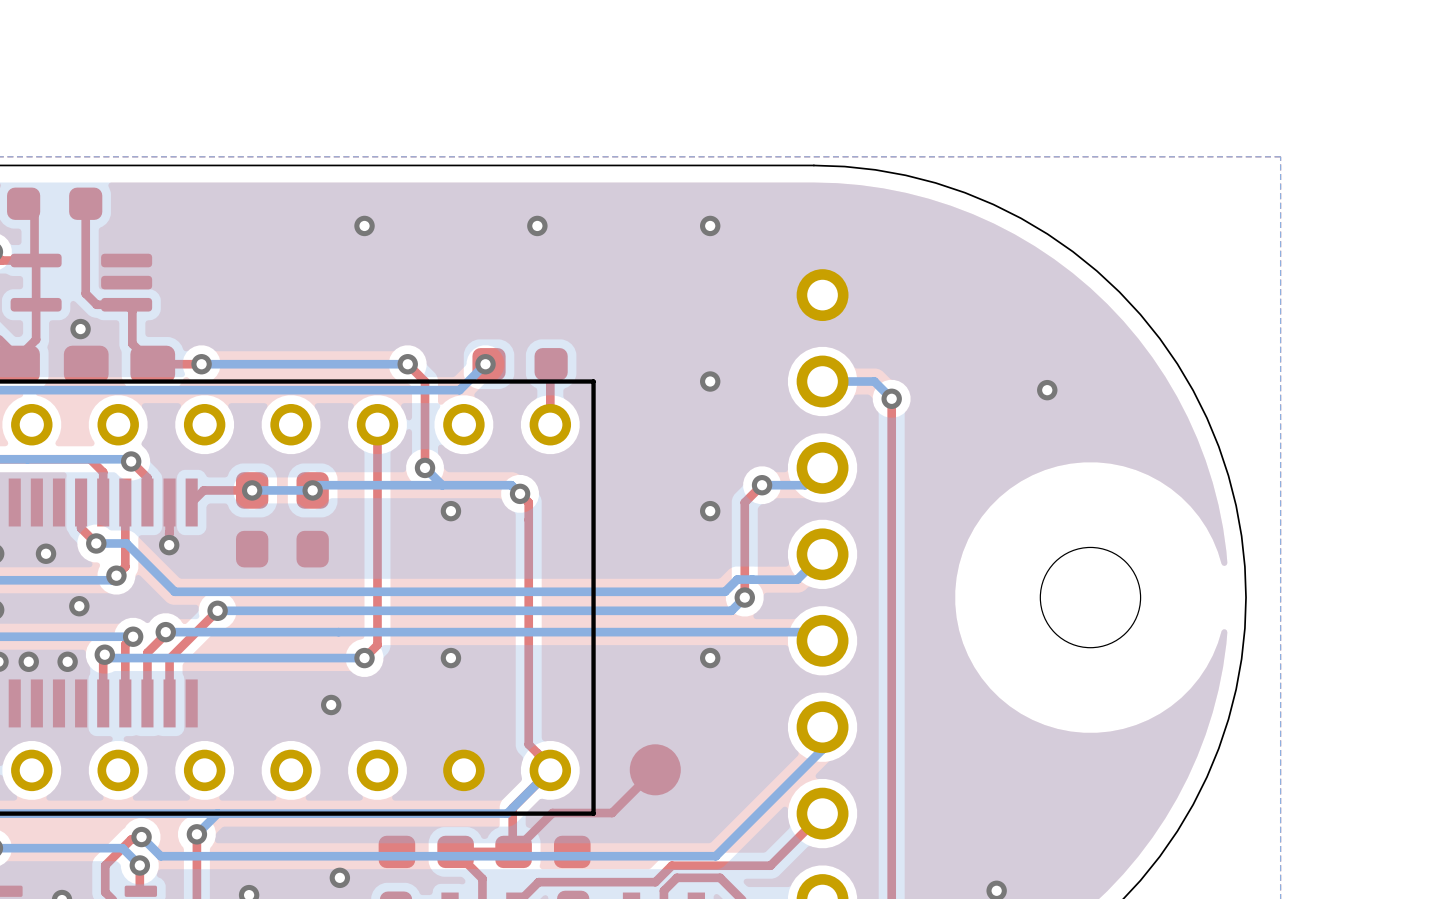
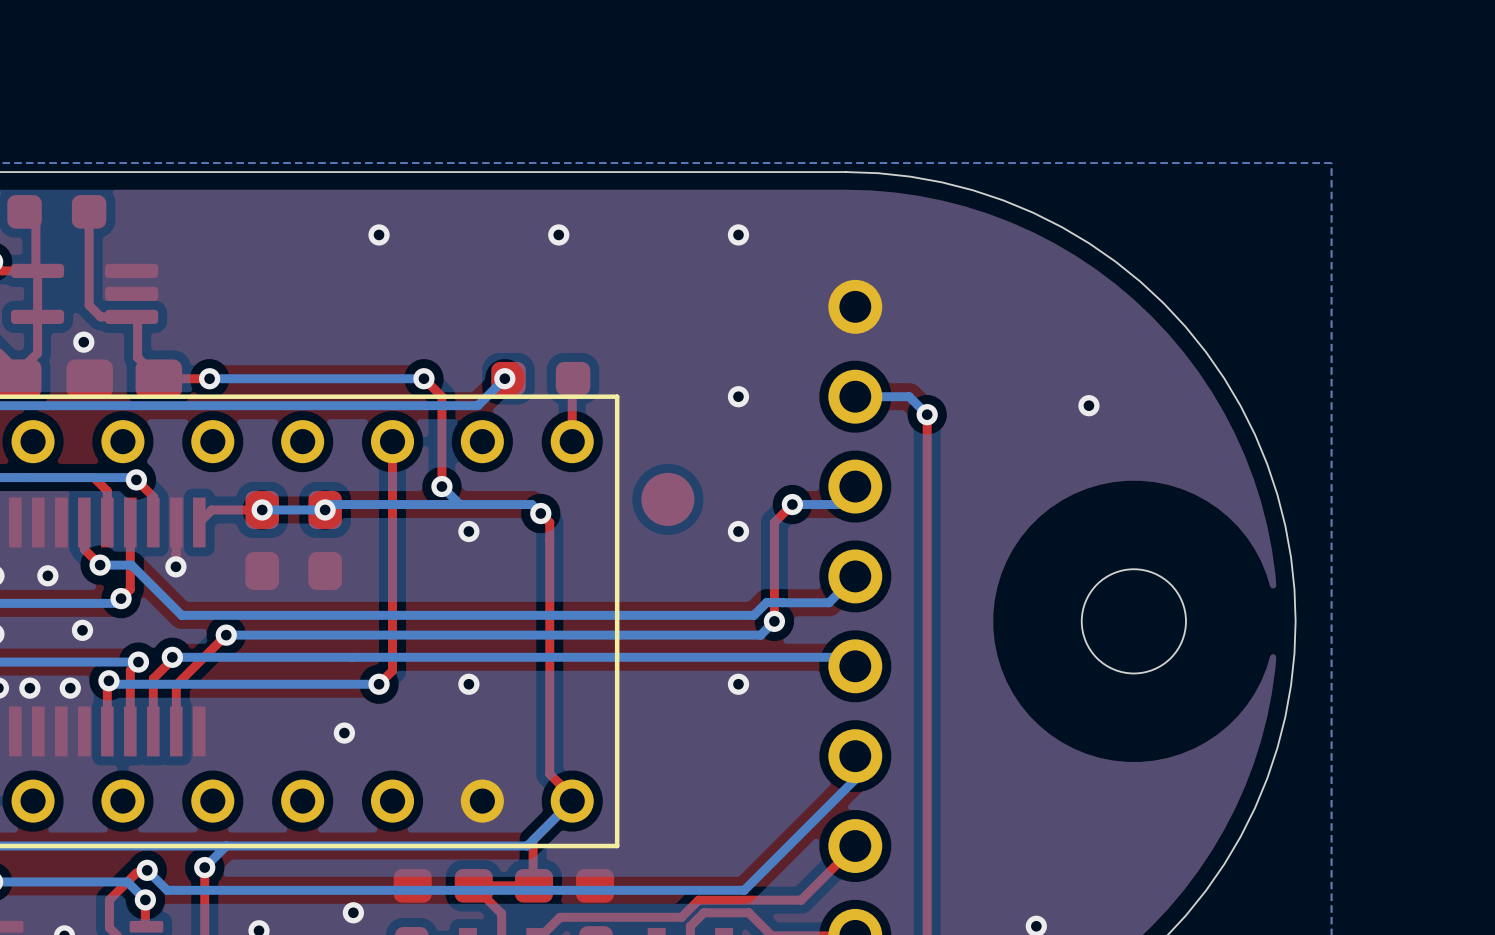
top track: (655, 769) (612, 813) (552, 813) (513, 851) -> none
part position: (655, 769) -> (667, 499)

